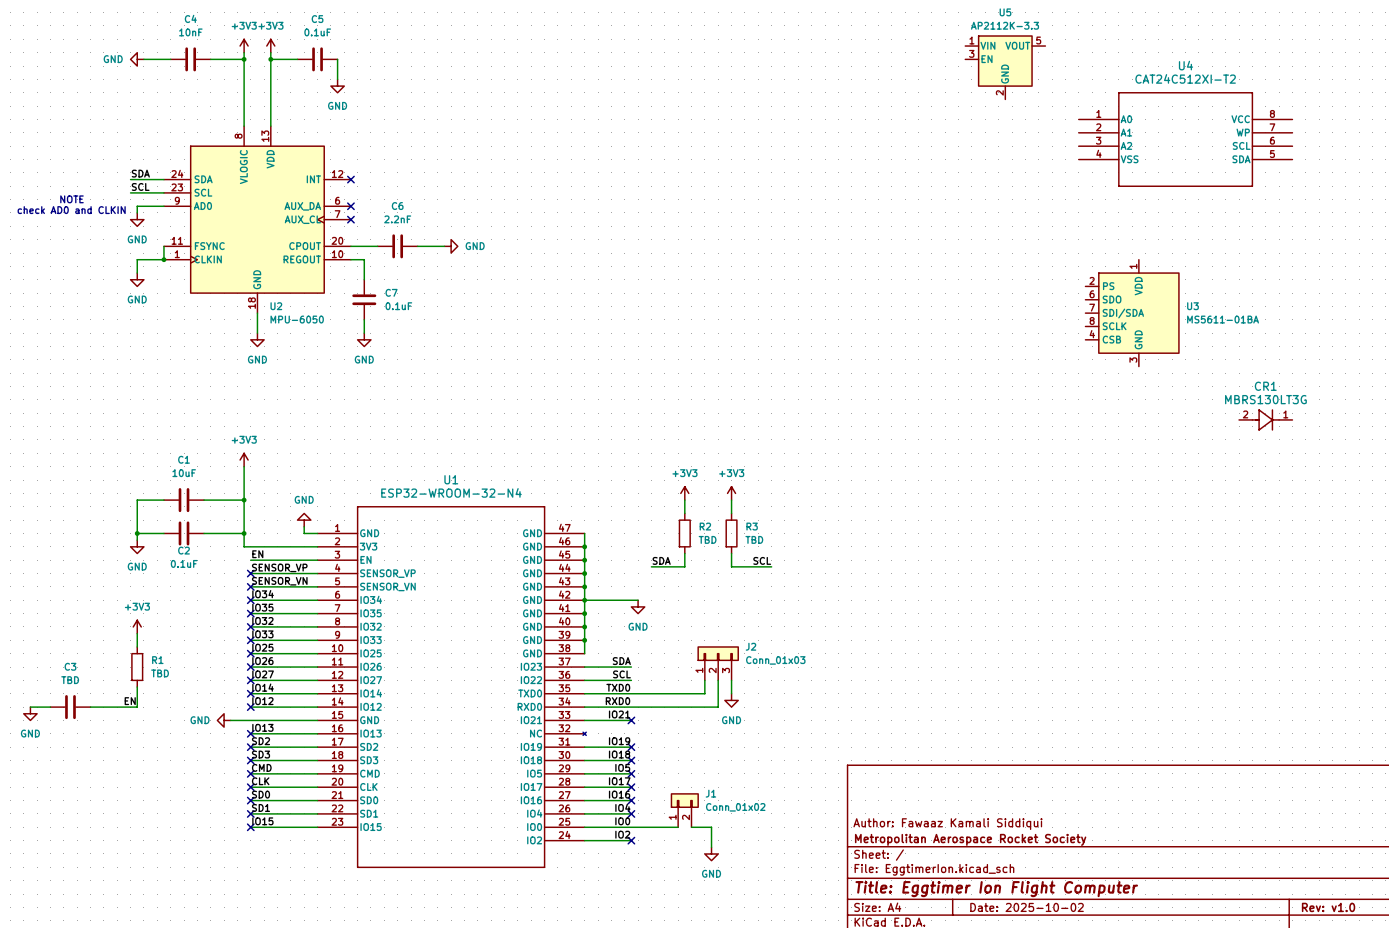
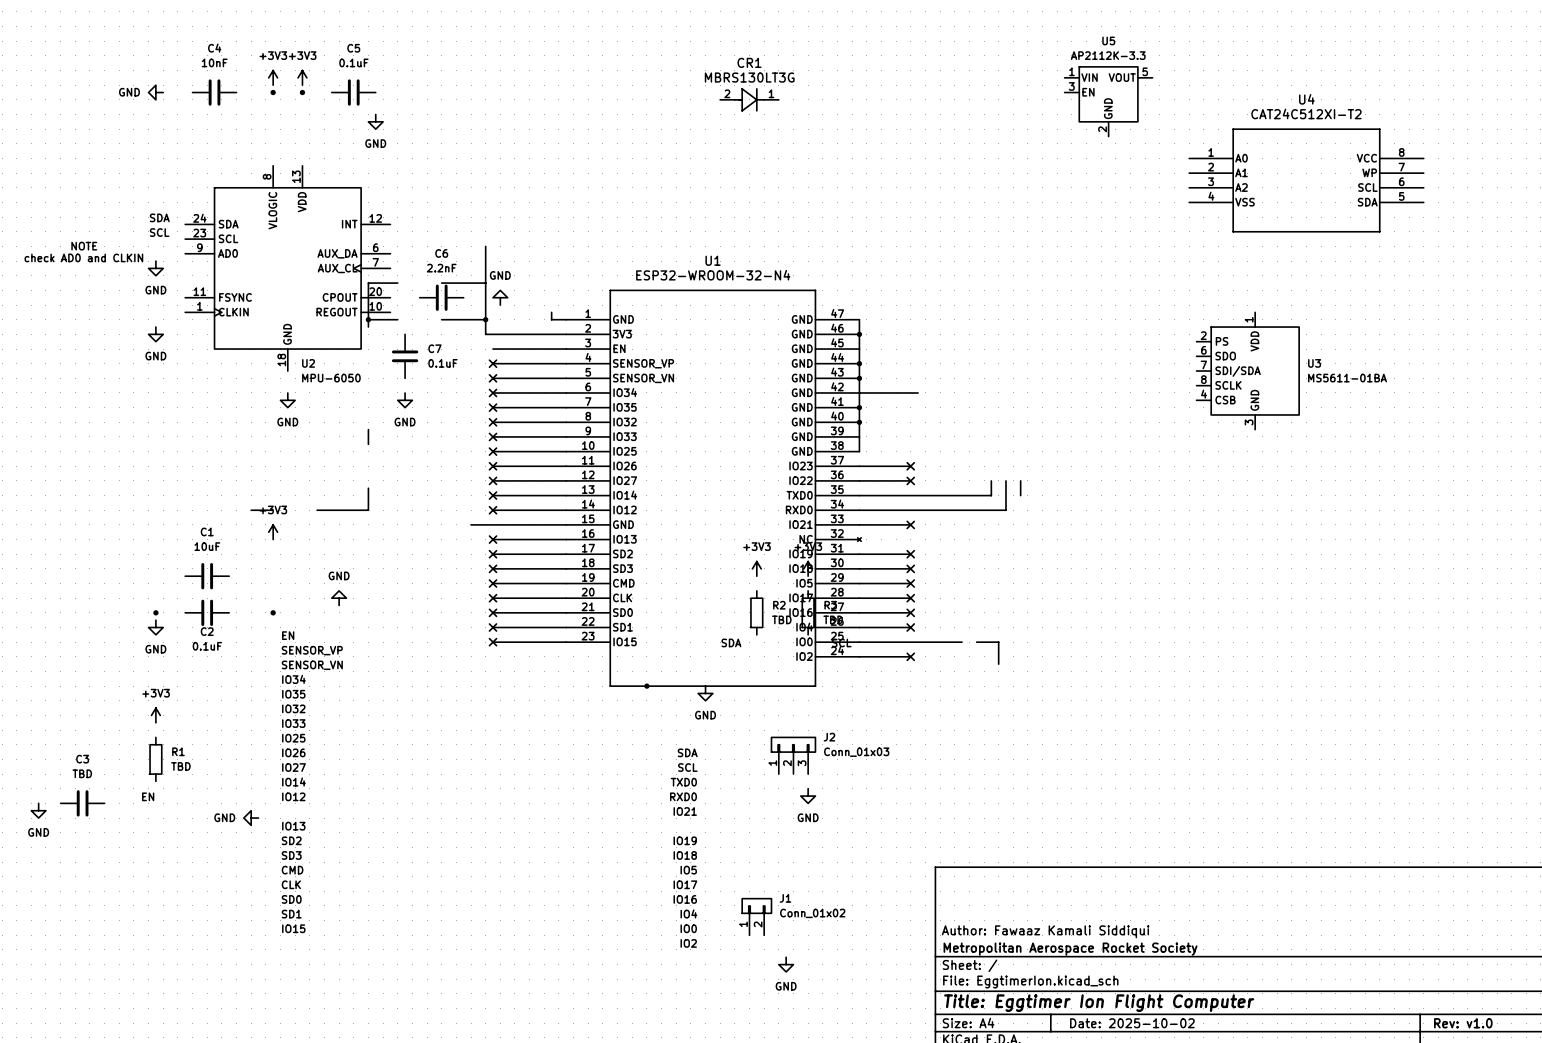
wire: (244, 52) (244, 126) -> none
wire: (270, 52) (270, 126) -> none
wire: (143, 59) (170, 59) -> none
wire: (210, 59) (244, 59) -> none
wire: (270, 59) (297, 59) -> none
wire: (337, 59) (337, 79) -> none
wire: (130, 179) (163, 179) -> none
no-connect mark: (350, 179) -> none
wire: (130, 192) (163, 192) -> none
wire: none -> (485, 246) (485, 334) (566, 334)
wire: (163, 206) (137, 206) (137, 212) -> none
no-connect mark: (350, 206) -> none
no-connect mark: (350, 219) -> none
wire: none -> (397, 283) (368, 283) (368, 327)
wire: none -> (441, 283) (485, 283)
wire: (163, 246) (163, 259) (137, 259) (137, 273) -> none
wire: (350, 246) (377, 246) -> (368, 319) (397, 319)
wire: (417, 246) (444, 246) -> none
power symbol rotation: 0° (451, 246) -> 90° counterclockwise (500, 297)
junction: (163, 259) -> none
wire: (350, 259) (364, 259) (364, 279) -> none
wire: none -> (551, 312) (551, 319) (566, 319)
junction: none -> (368, 319)
wire: none -> (441, 319) (485, 319)
junction: none -> (485, 319)
wire: none -> (859, 319) (859, 451)
junction: none -> (859, 334)
wire: none -> (493, 349) (566, 349)
wire: none -> (493, 363) (566, 363)
no-connect mark: none -> (493, 363)
junction: none -> (859, 363)
wire: (257, 313) (257, 333) -> none
wire: (364, 319) (364, 333) -> (368, 429) (368, 444)
wire: none -> (493, 378) (566, 378)
no-connect mark: none -> (493, 378)
junction: none -> (859, 378)
wire: none -> (493, 392) (566, 392)
no-connect mark: none -> (493, 392)
wire: none -> (859, 392) (918, 392)
wire: none -> (493, 407) (566, 407)
no-connect mark: none -> (493, 407)
junction: none -> (859, 407)
wire: none -> (493, 422) (566, 422)
no-connect mark: none -> (493, 422)
junction: none -> (859, 422)
wire: none -> (493, 436) (566, 436)
no-connect mark: none -> (493, 436)
wire: none -> (493, 451) (566, 451)
no-connect mark: none -> (493, 451)
wire: none -> (493, 466) (566, 466)
no-connect mark: none -> (493, 466)
wire: none -> (859, 466) (910, 466)
no-connect mark: none -> (910, 466)
wire: none -> (493, 480) (566, 480)
no-connect mark: none -> (493, 480)
wire: none -> (859, 480) (910, 480)
no-connect mark: none -> (910, 480)
wire: none -> (991, 480) (991, 495) (859, 495)
wire: none -> (1005, 480) (1005, 510) (859, 510)
wire: none -> (1020, 480) (1020, 495)
wire: none -> (368, 488) (368, 510) (317, 510)
CR1 position: (1265, 419) -> (749, 99)
wire: none -> (493, 495) (566, 495)
no-connect mark: none -> (493, 495)
wire: none -> (251, 510) (273, 510)
wire: none -> (493, 510) (566, 510)
no-connect mark: none -> (493, 510)
wire: none -> (471, 524) (566, 524)
wire: none -> (859, 524) (910, 524)
no-connect mark: none -> (910, 524)
wire: (244, 466) (244, 546) (317, 546) -> none
wire: none -> (493, 539) (566, 539)
no-connect mark: none -> (493, 539)
wire: none -> (493, 554) (566, 554)
no-connect mark: none -> (493, 554)
wire: none -> (859, 554) (910, 554)
no-connect mark: none -> (910, 554)
wire: none -> (493, 568) (566, 568)
no-connect mark: none -> (493, 568)
wire: none -> (859, 568) (910, 568)
no-connect mark: none -> (910, 568)
wire: (163, 500) (137, 500) (137, 540) -> none
wire: (204, 500) (244, 500) -> none
junction: (244, 500) -> none
wire: (684, 500) (684, 513) -> none
no-connect mark: none -> (493, 583)
wire: none -> (859, 583) (910, 583)
no-connect mark: none -> (910, 583)
wire: none -> (493, 598) (566, 598)
no-connect mark: none -> (493, 598)
wire: none -> (859, 598) (910, 598)
no-connect mark: none -> (910, 598)
wire: (304, 526) (304, 533) (317, 533) -> none
wire: (137, 533) (163, 533) -> none
wire: (204, 533) (244, 533) -> none
wire: none -> (493, 612) (566, 612)
no-connect mark: none -> (493, 612)
wire: (584, 533) (584, 653) -> none
wire: none -> (859, 612) (910, 612)
no-connect mark: none -> (910, 612)
wire: none -> (493, 627) (566, 627)
no-connect mark: none -> (493, 627)
junction: (584, 546) -> none
wire: none -> (859, 627) (910, 627)
no-connect mark: none -> (910, 627)
wire: (684, 553) (684, 566) (651, 566) -> none
wire: (731, 553) (731, 566) (771, 566) -> none
wire: (250, 560) (317, 560) -> none
wire: none -> (493, 642) (566, 642)
no-connect mark: none -> (493, 642)
junction: (584, 560) -> none
wire: none -> (859, 642) (962, 642)
wire: none -> (976, 642) (998, 642) (998, 664)
wire: (250, 573) (317, 573) -> none
no-connect mark: (250, 573) -> none
junction: (584, 573) -> none
wire: none -> (859, 656) (910, 656)
no-connect mark: none -> (910, 656)
wire: (250, 586) (317, 586) -> none
no-connect mark: (250, 586) -> none
junction: (584, 586) -> none
wire: (250, 600) (317, 600) -> none
no-connect mark: (250, 600) -> none
wire: (250, 613) (317, 613) -> none
no-connect mark: (250, 613) -> none
junction: (584, 613) -> none
wire: (250, 626) (317, 626) -> none
no-connect mark: (250, 626) -> none
junction: (584, 626) -> none
wire: (137, 633) (137, 646) -> none
wire: (250, 640) (317, 640) -> none
no-connect mark: (250, 640) -> none
junction: (584, 640) -> none
wire: (250, 653) (317, 653) -> none
no-connect mark: (250, 653) -> none
wire: (250, 667) (317, 667) -> none
no-connect mark: (250, 667) -> none
wire: (584, 667) (631, 667) -> none
wire: (250, 680) (317, 680) -> none
no-connect mark: (250, 680) -> none
wire: (584, 680) (631, 680) -> none
wire: (704, 680) (704, 693) (584, 693) -> none
wire: (718, 680) (718, 707) (584, 707) -> none
wire: (731, 680) (731, 693) -> none
wire: (137, 687) (137, 707) (90, 707) -> none
U1 position: (451, 687) -> (713, 488)
wire: (250, 693) (317, 693) -> none
no-connect mark: (250, 693) -> none
wire: (30, 707) (50, 707) -> none
wire: (250, 707) (317, 707) -> none
no-connect mark: (250, 707) -> none
wire: (230, 720) (317, 720) -> none
wire: (584, 720) (631, 720) -> none
no-connect mark: (631, 720) -> none
wire: (250, 733) (317, 733) -> none
no-connect mark: (250, 733) -> none
wire: (250, 747) (317, 747) -> none
no-connect mark: (250, 747) -> none
wire: (584, 747) (631, 747) -> none
no-connect mark: (631, 747) -> none
wire: (250, 760) (317, 760) -> none
no-connect mark: (250, 760) -> none
wire: (584, 760) (631, 760) -> none
no-connect mark: (631, 760) -> none
wire: (250, 773) (317, 773) -> none
no-connect mark: (250, 773) -> none
wire: (584, 773) (631, 773) -> none
no-connect mark: (631, 773) -> none
wire: (250, 787) (317, 787) -> none
no-connect mark: (250, 787) -> none
wire: (584, 787) (631, 787) -> none
no-connect mark: (631, 787) -> none
wire: (250, 800) (317, 800) -> none
no-connect mark: (250, 800) -> none
wire: (584, 800) (631, 800) -> none
no-connect mark: (631, 800) -> none
wire: (250, 813) (317, 813) -> none
no-connect mark: (250, 813) -> none
wire: (584, 813) (631, 813) -> none
no-connect mark: (631, 813) -> none
wire: (250, 827) (317, 827) -> none
no-connect mark: (250, 827) -> none
wire: (584, 827) (678, 827) -> none
wire: (691, 827) (711, 827) (711, 847) -> none
wire: (584, 840) (631, 840) -> none
no-connect mark: (631, 840) -> none

